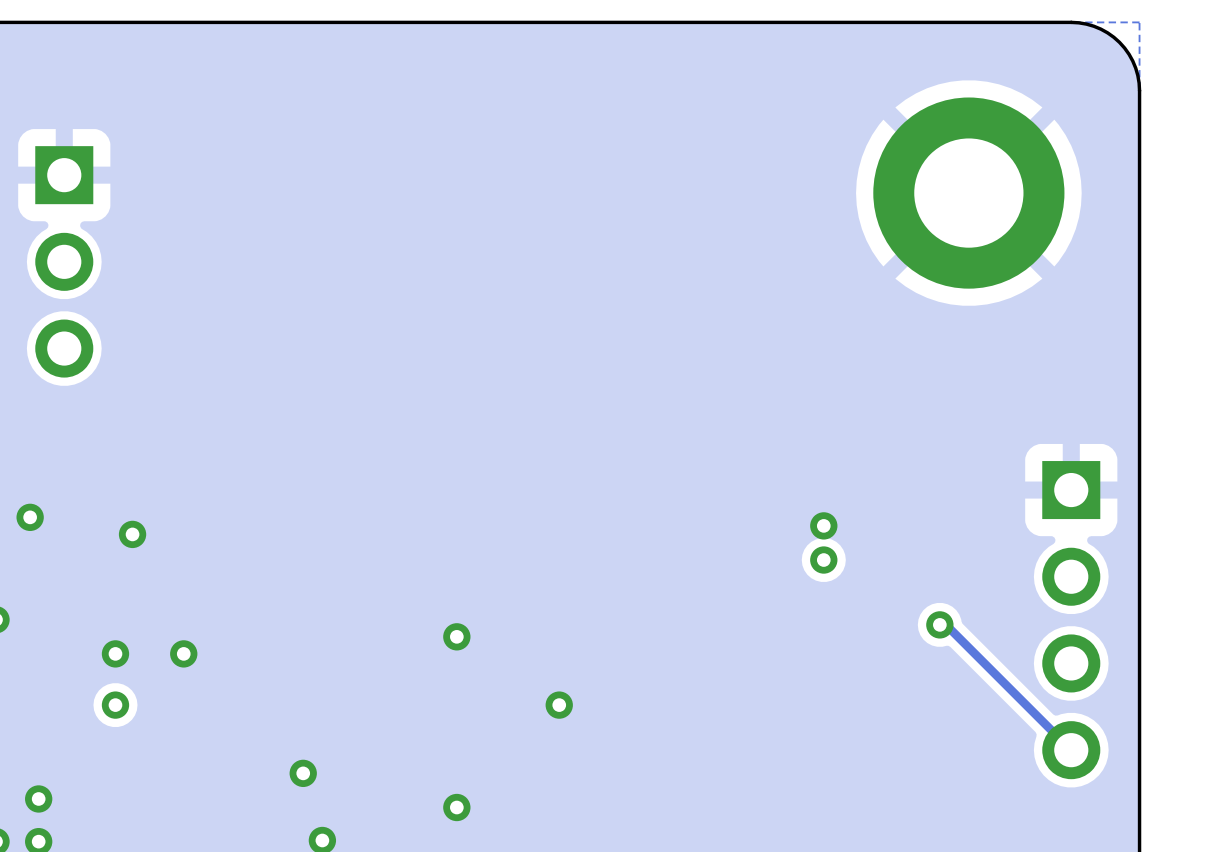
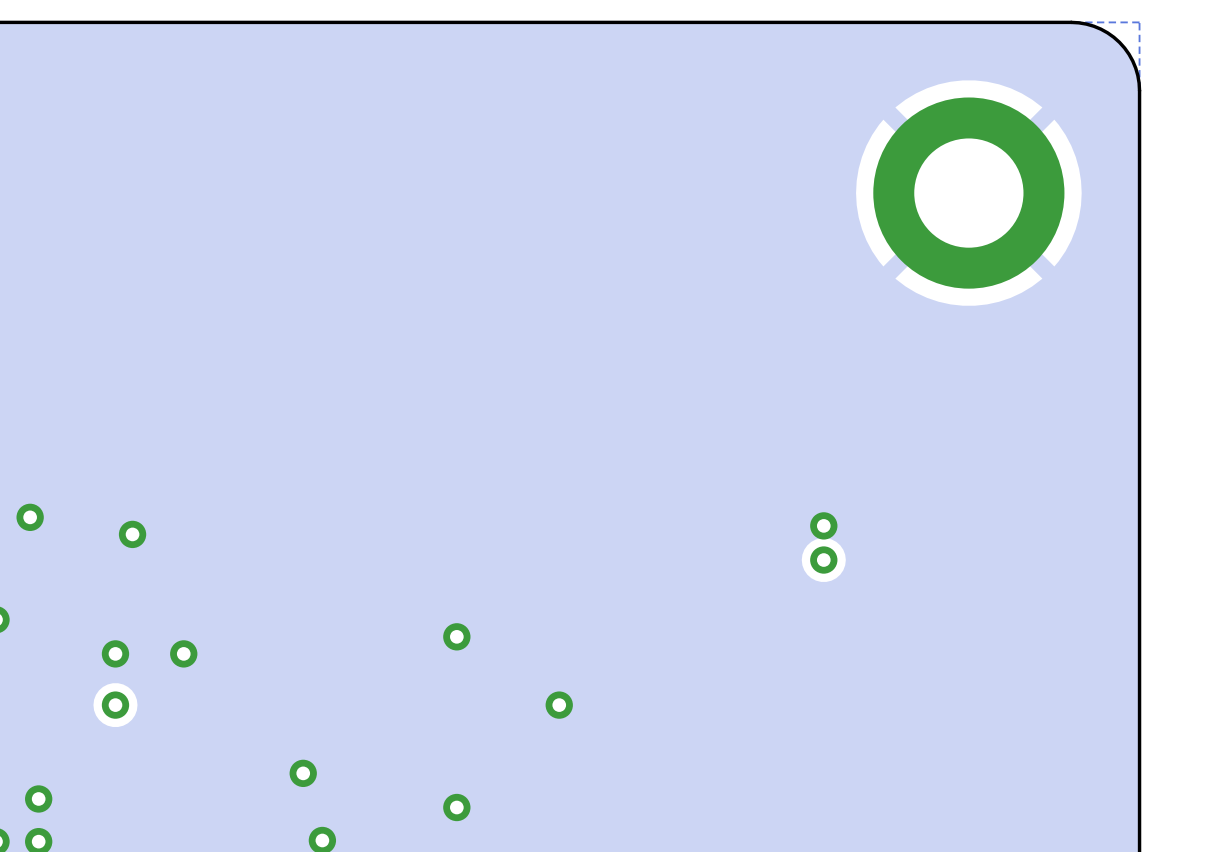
part: (64, 261) -> none
part: (1071, 620) -> none
track: (939, 624) (946, 624) (1071, 750) -> none
via: (939, 624) -> none

